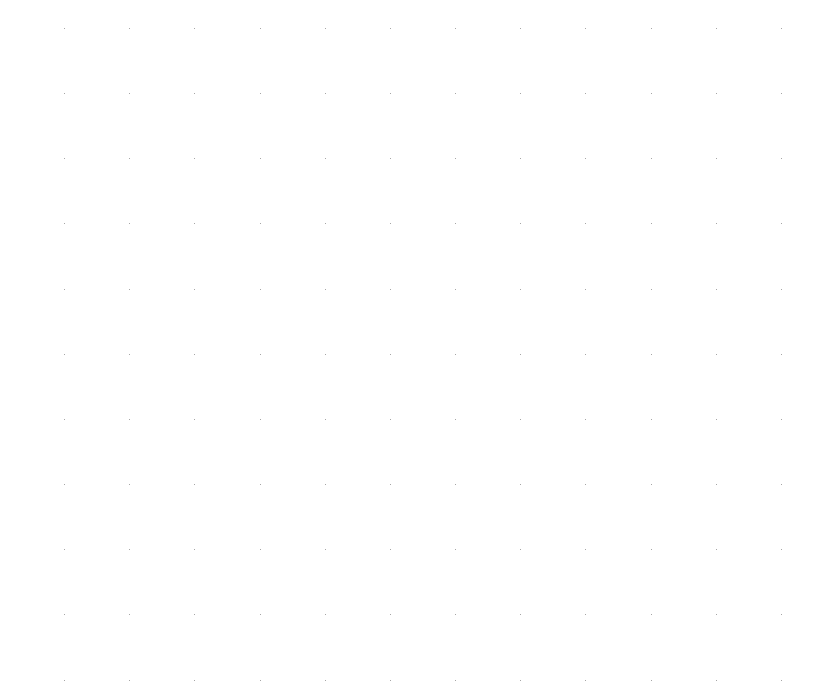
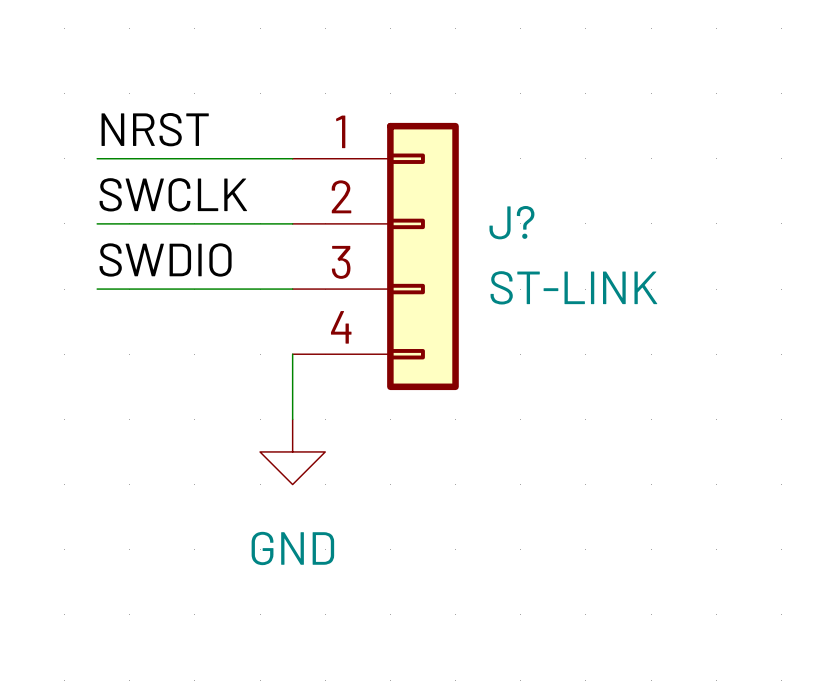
label: none -> NRST (155, 129)
wire: none -> (97, 158) (292, 158)
label: none -> SWCLK (173, 194)
wire: none -> (97, 223) (292, 223)
J?: none -> ST-LINK (375, 256)
label: none -> SWDIO (165, 259)
wire: none -> (97, 289) (292, 289)
wire: none -> (292, 354) (292, 419)
power symbol: none -> GND (292, 451)

